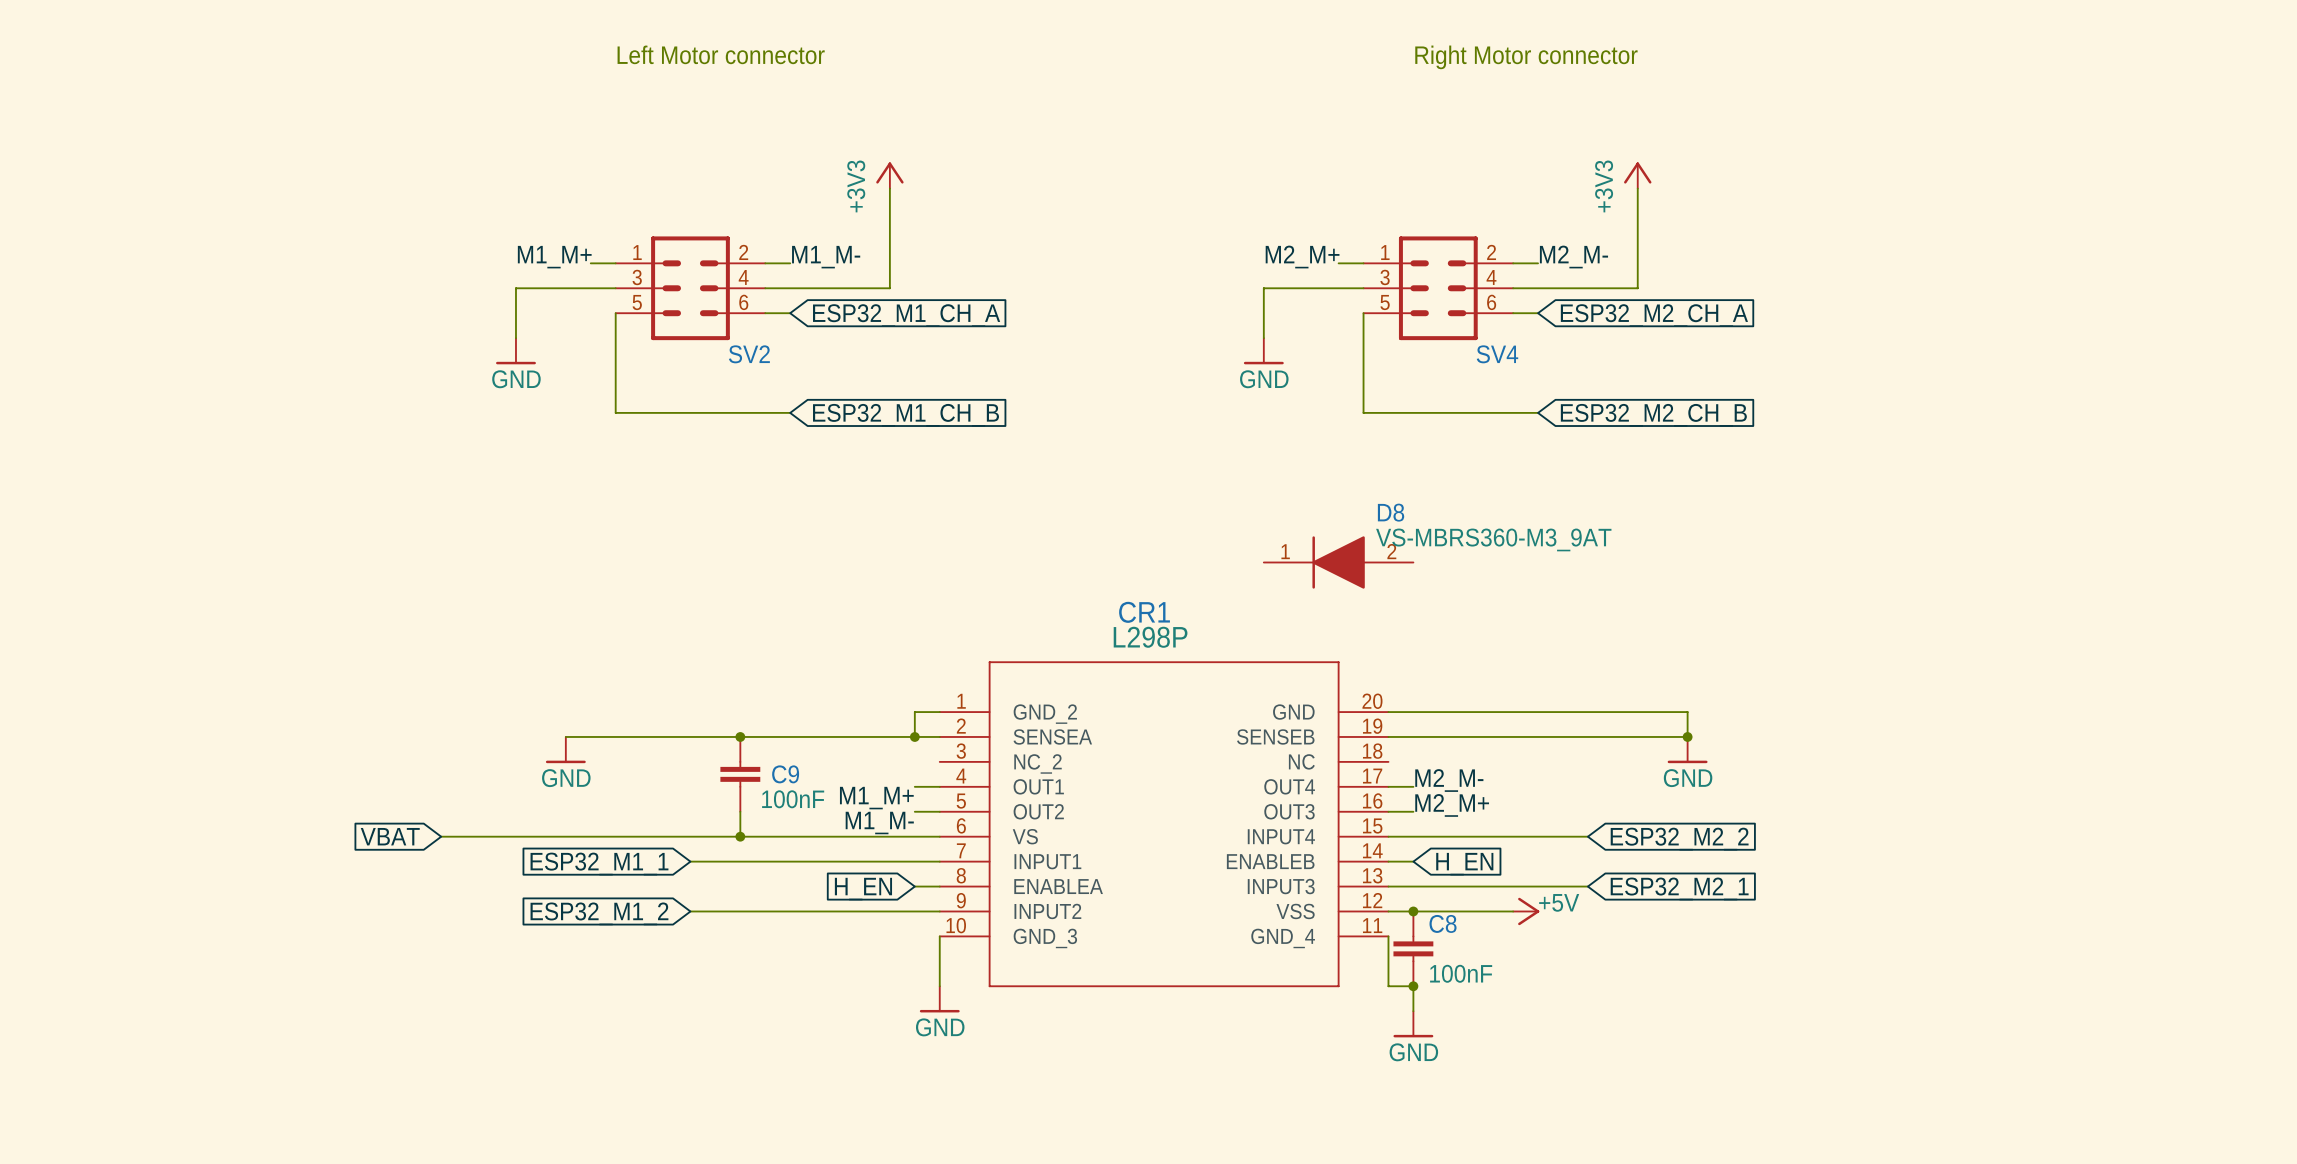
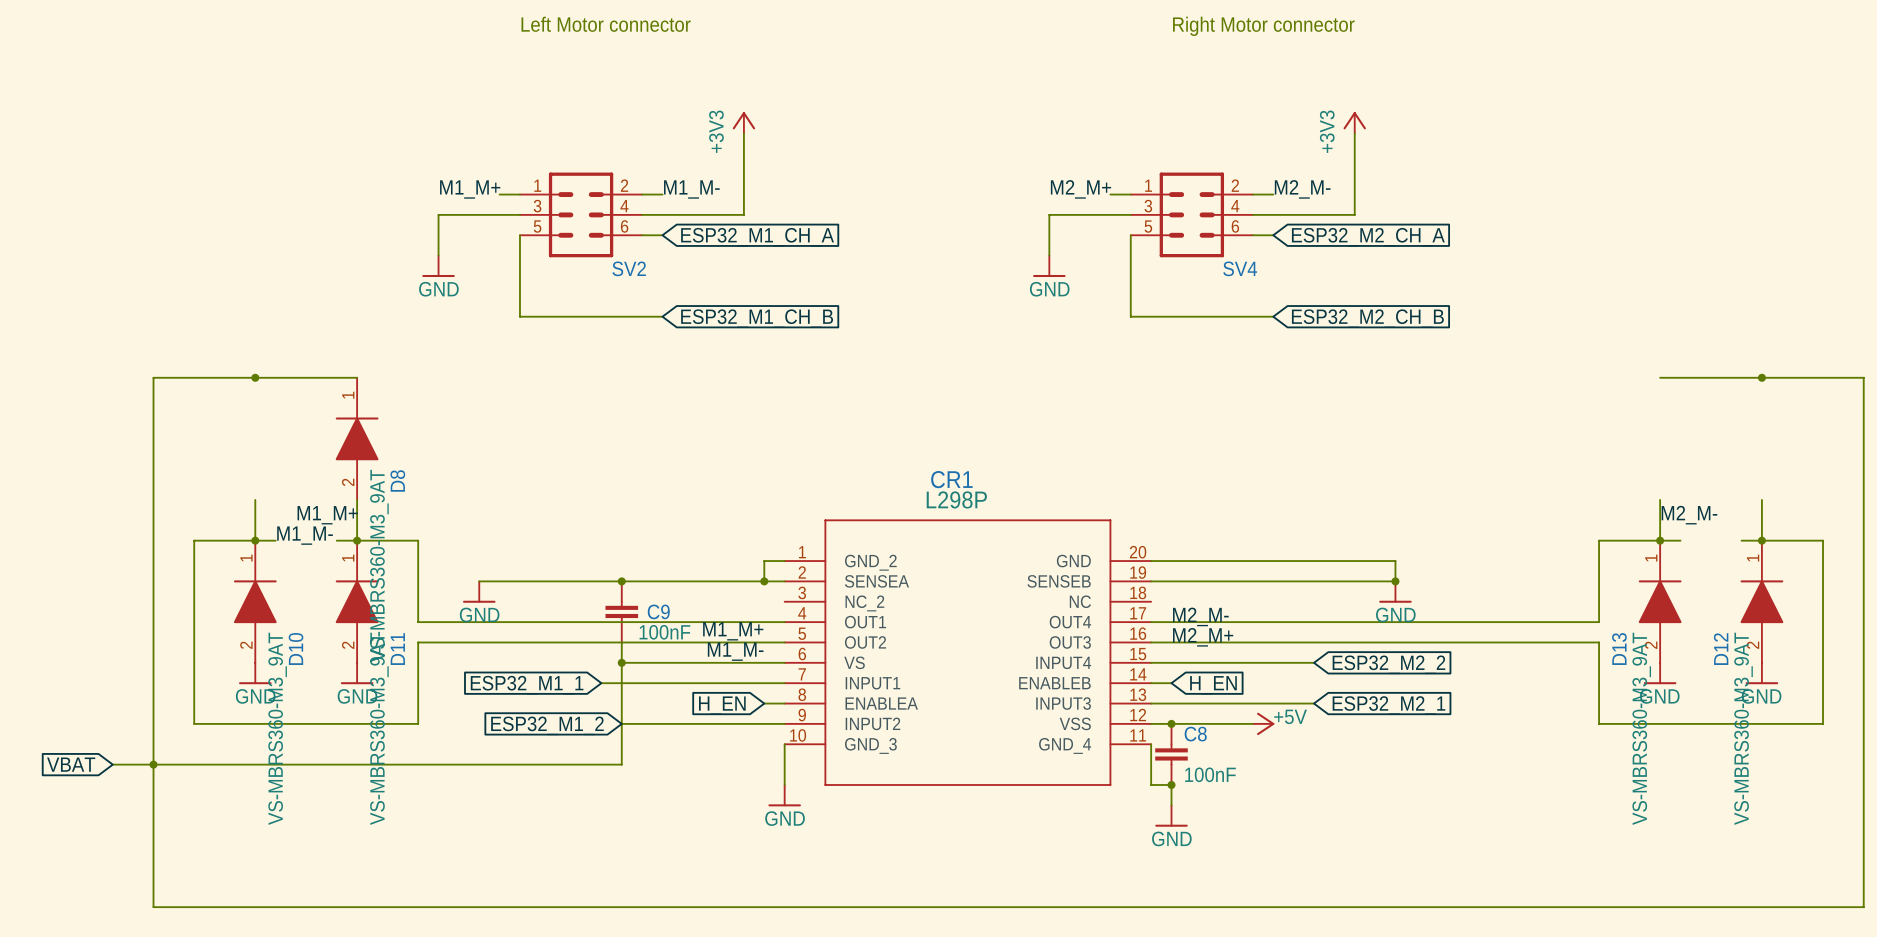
junction: none -> (255, 377)
wire: none -> (357, 377) (153, 377) (153, 907) (1863, 907) (1863, 377) (1660, 377)
junction: none -> (1761, 377)
D8 rotation: 0° (1338, 562) -> 90° clockwise (357, 438)
D8 position: (1338, 562) -> (357, 438)
wire: none -> (255, 499) (255, 540)
wire: none -> (357, 499) (357, 540)
wire: none -> (1660, 499) (1660, 540)
wire: none -> (1761, 499) (1761, 540)
label: none -> M1_M+ (327, 515)
label: none -> M2_M- (1689, 515)
label: none -> M1_M- (305, 535)
junction: none -> (255, 540)
wire: none -> (275, 540) (194, 540) (194, 723) (418, 723) (418, 642) (764, 642)
wire: none -> (336, 540) (418, 540) (418, 622) (764, 622)
junction: none -> (357, 540)
junction: none -> (1660, 540)
wire: none -> (1680, 540) (1599, 540) (1599, 622) (1171, 622)
wire: none -> (1741, 540) (1823, 540) (1823, 723) (1599, 723) (1599, 642) (1171, 642)
junction: none -> (1761, 540)
D10: none -> VS-MBRS360-M3_9AT (255, 601)
D11: none -> VS-MBRS360-M3_9AT (357, 601)
D13: none -> VS-MBRS360-M3_9AT (1660, 601)
D12: none -> VS-MBRS360-M3_9AT (1761, 601)
global label: VBAT (390, 836) -> none
wire: (441, 836) (740, 836) -> (112, 764) (621, 764) (621, 662)
power symbol: none -> GND (255, 673)
power symbol: none -> GND (357, 673)
power symbol: none -> GND (1660, 673)
power symbol: none -> GND (1761, 673)
wire: (690, 861) (715, 861) -> none
global label position: ESP32_M1_1 (599, 864) -> ESP32_M1_1 (527, 685)
wire: (690, 911) (740, 911) -> none
global label position: ESP32_M1_2 (599, 913) -> ESP32_M1_2 (547, 725)
global label: none -> VBAT (71, 764)
junction: none -> (153, 764)

